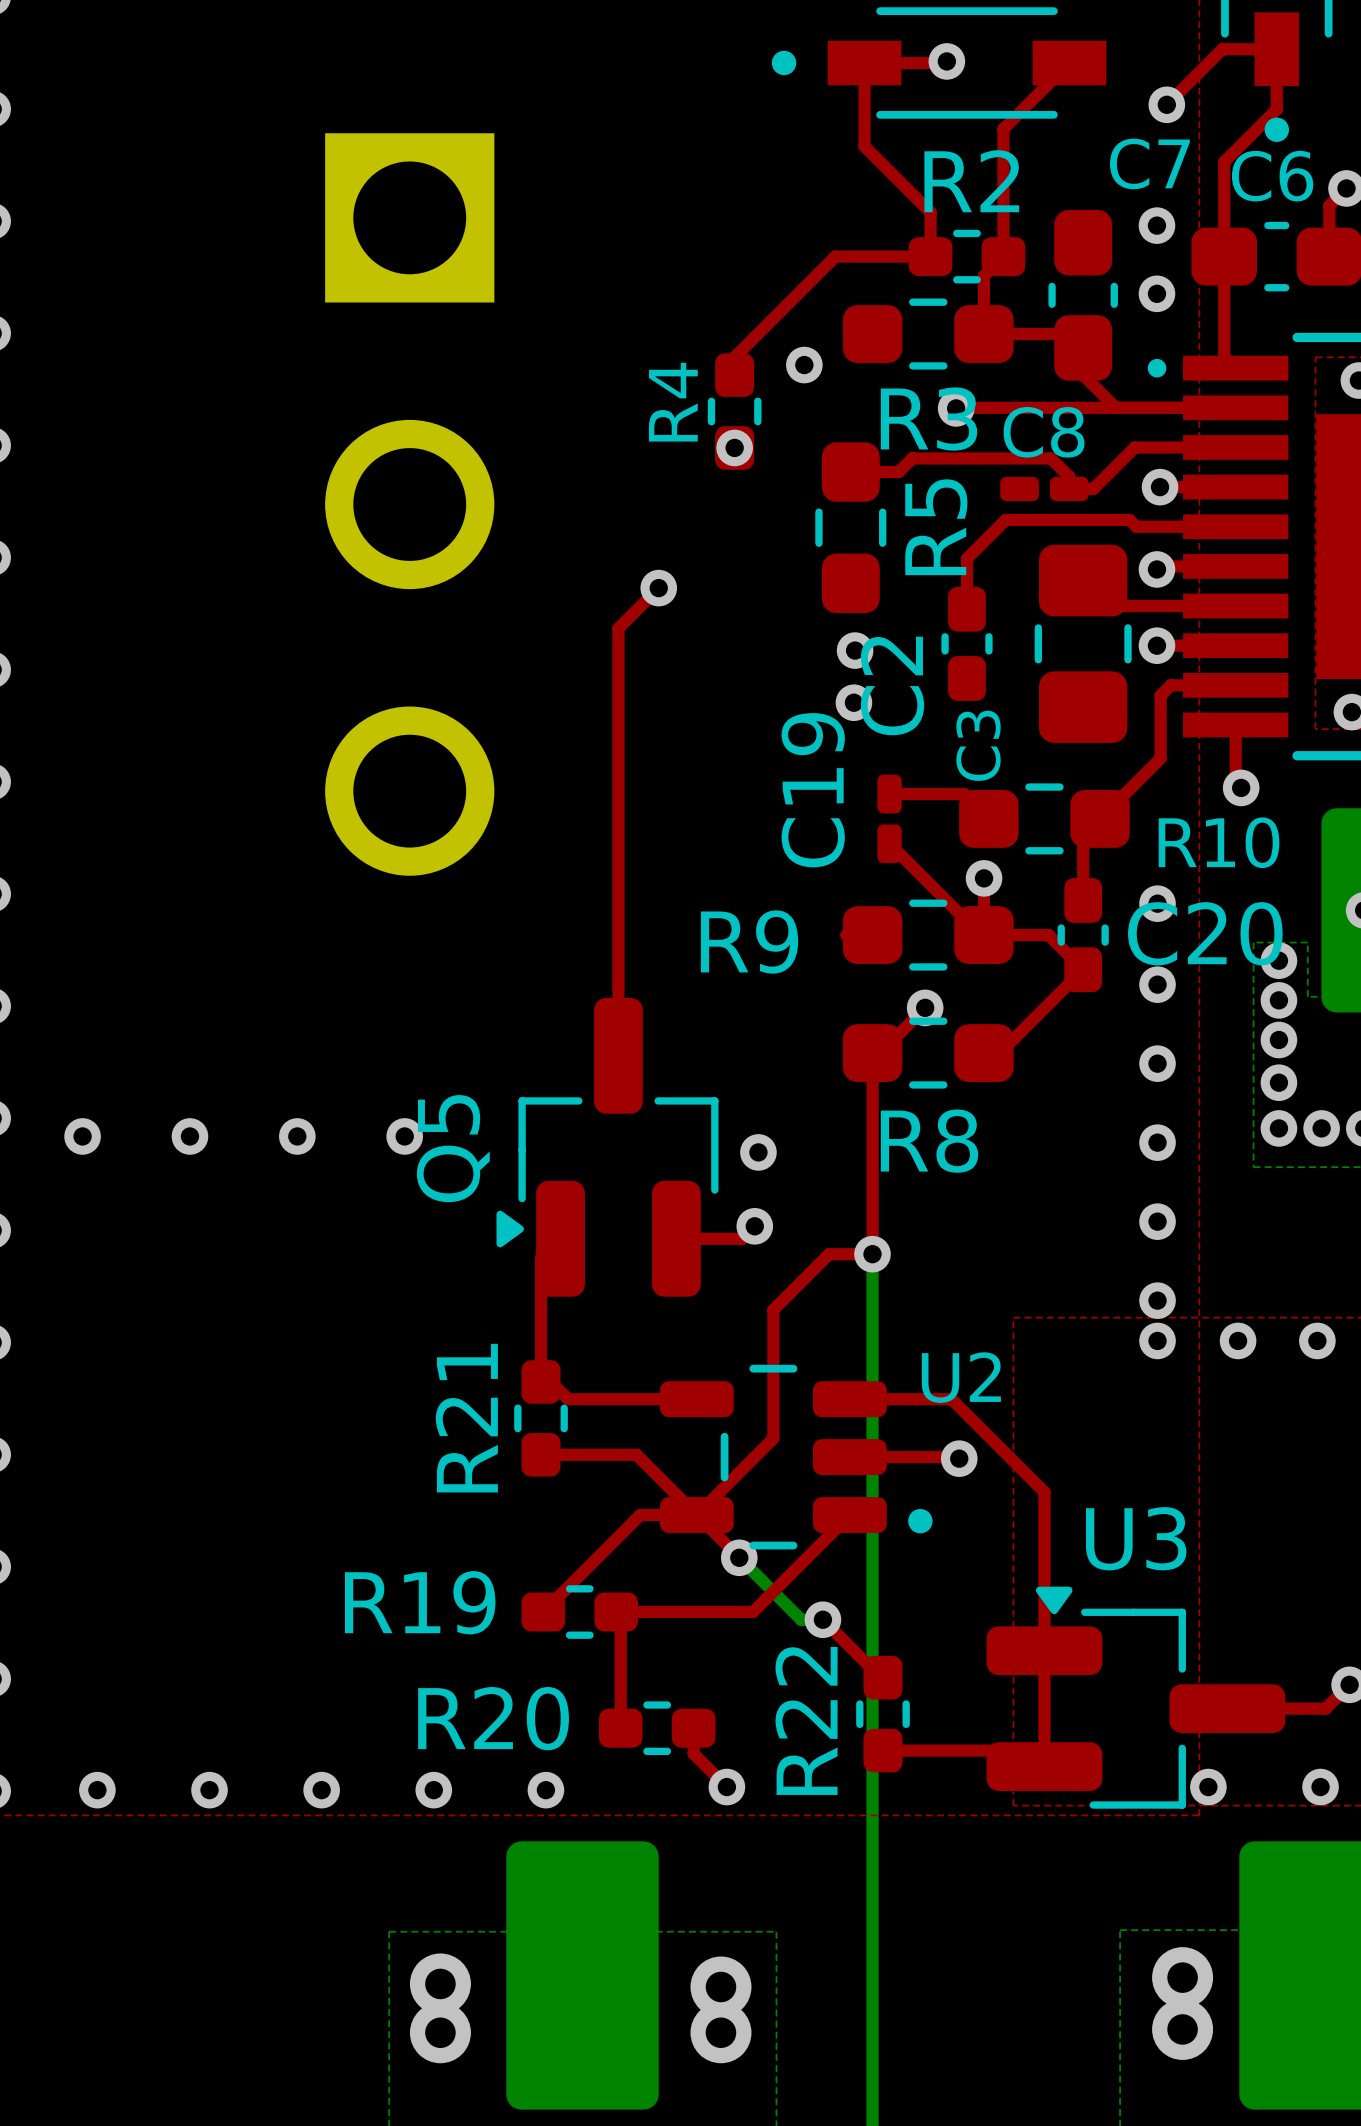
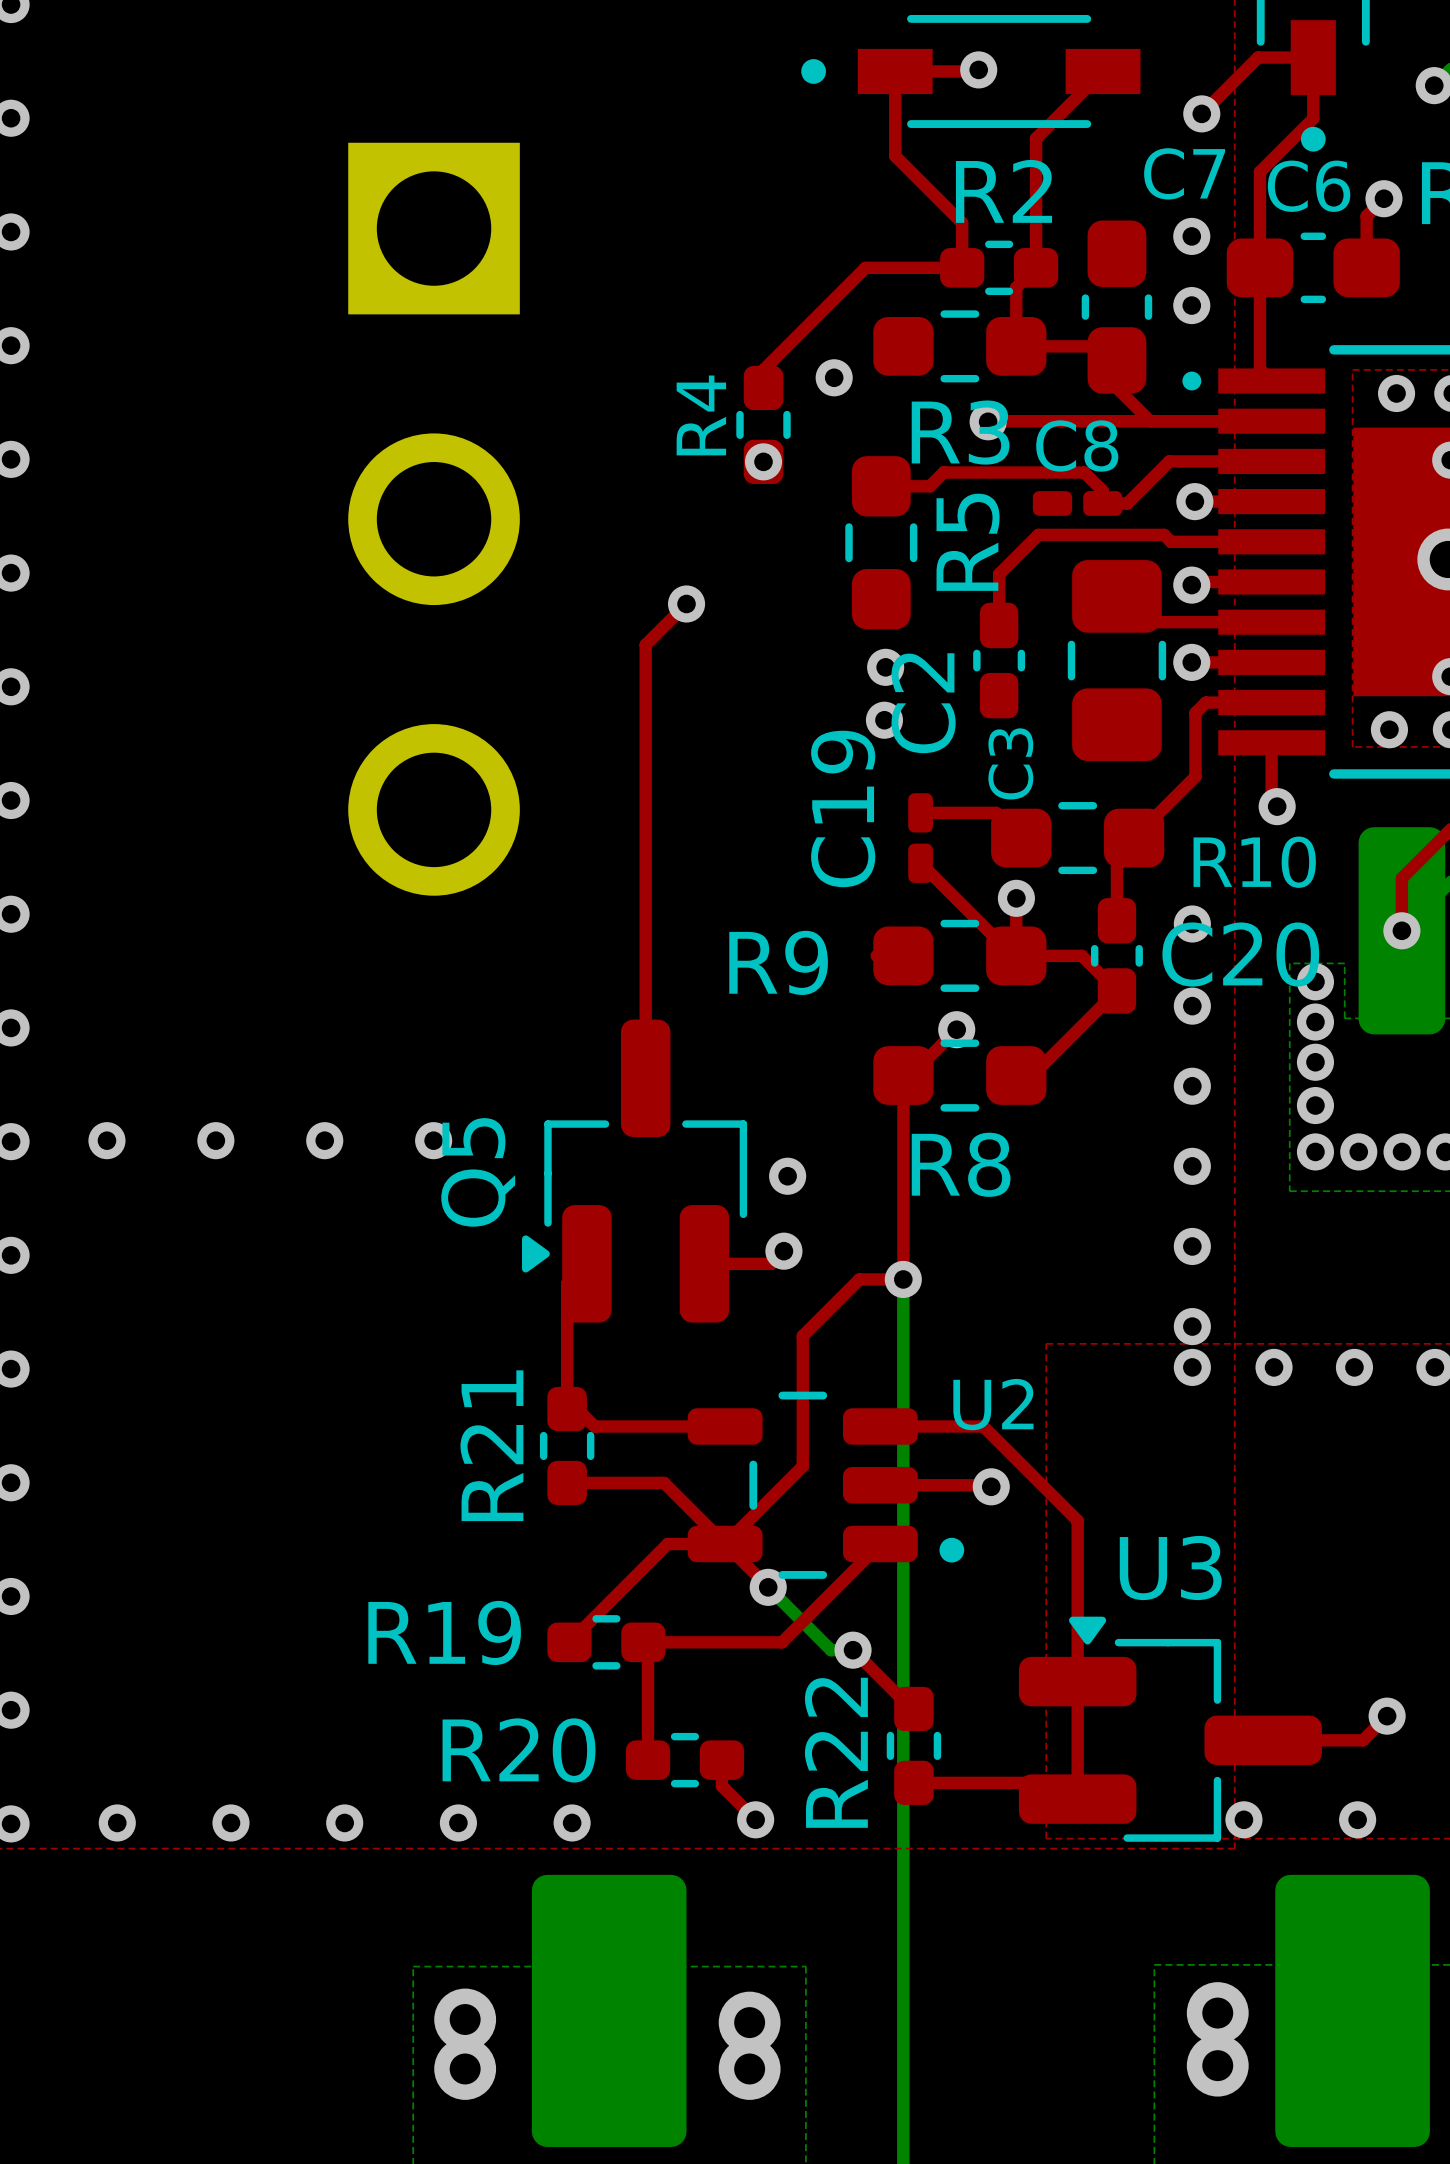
via position: (82, 1136) -> (106, 1140)
via position: (189, 1136) -> (215, 1140)
via position: (297, 1136) -> (324, 1140)
via position: (404, 1136) -> (433, 1140)

